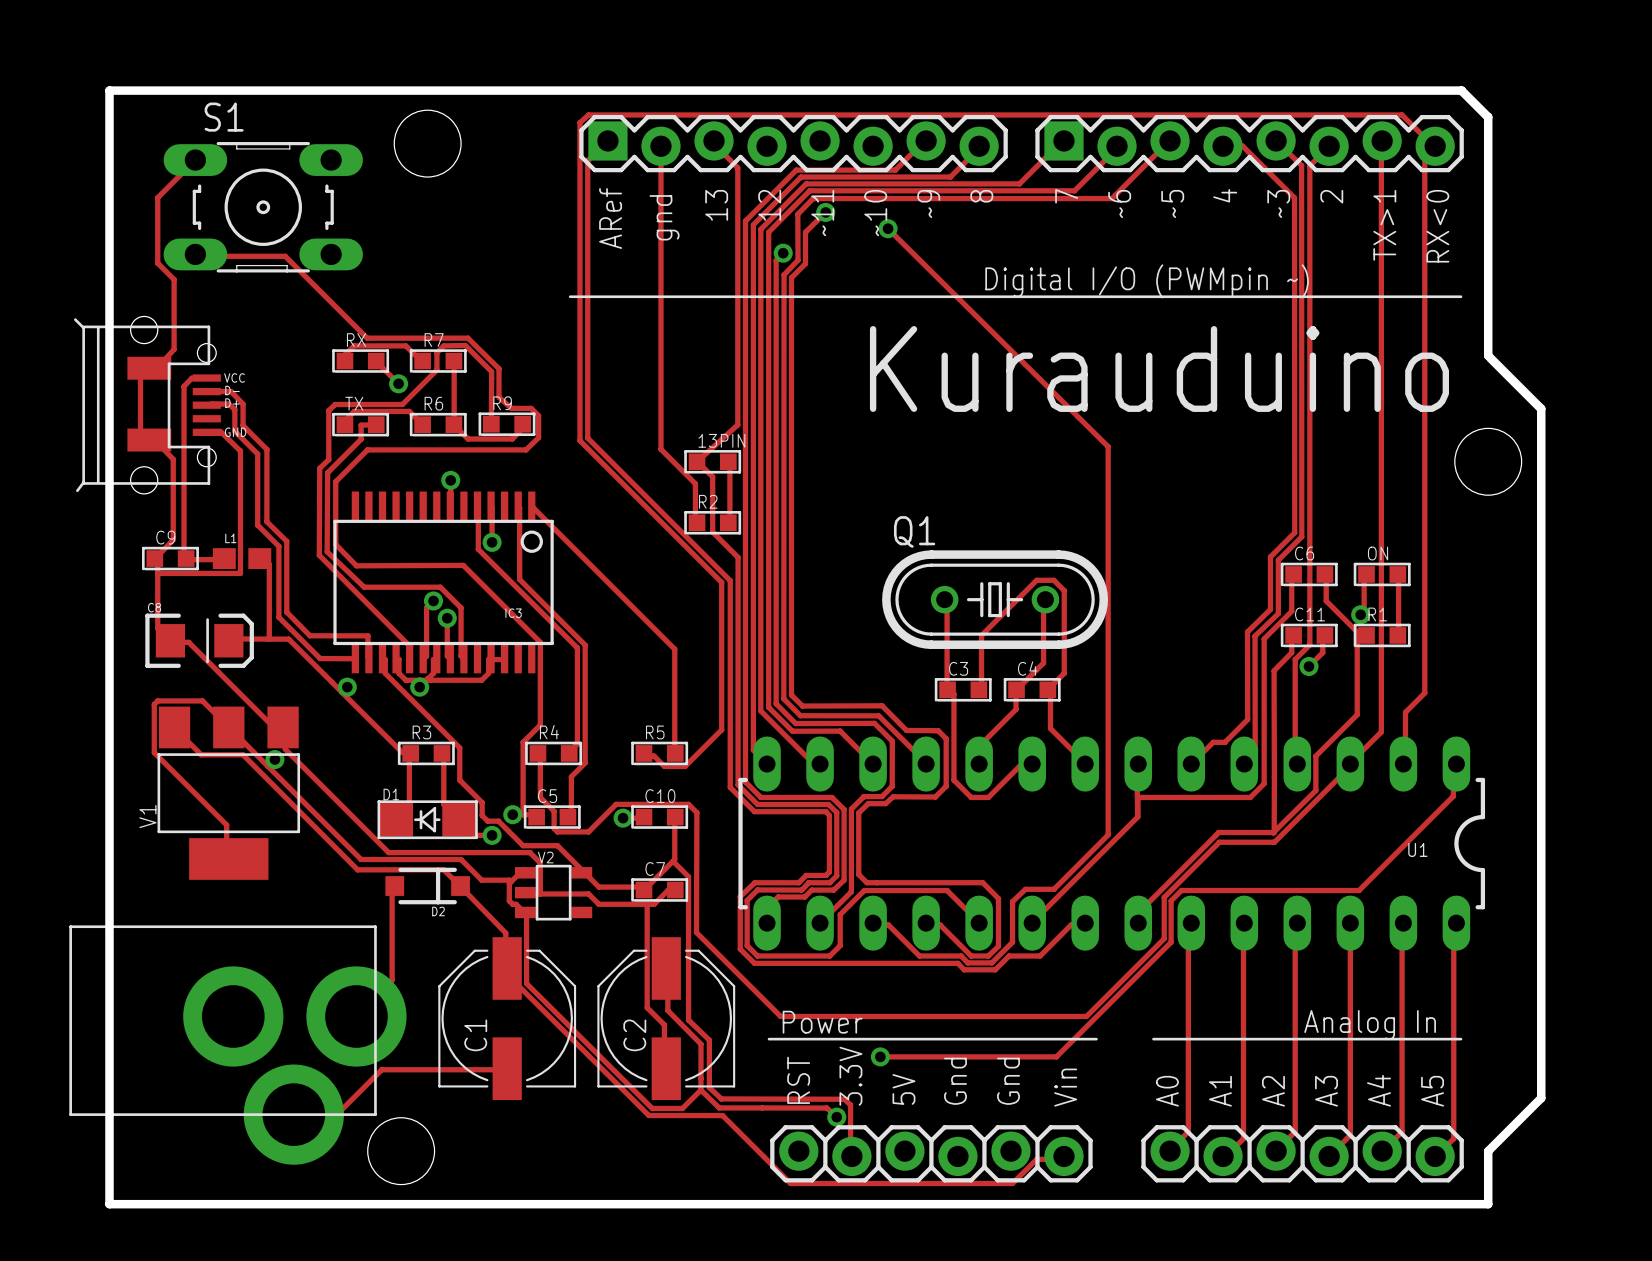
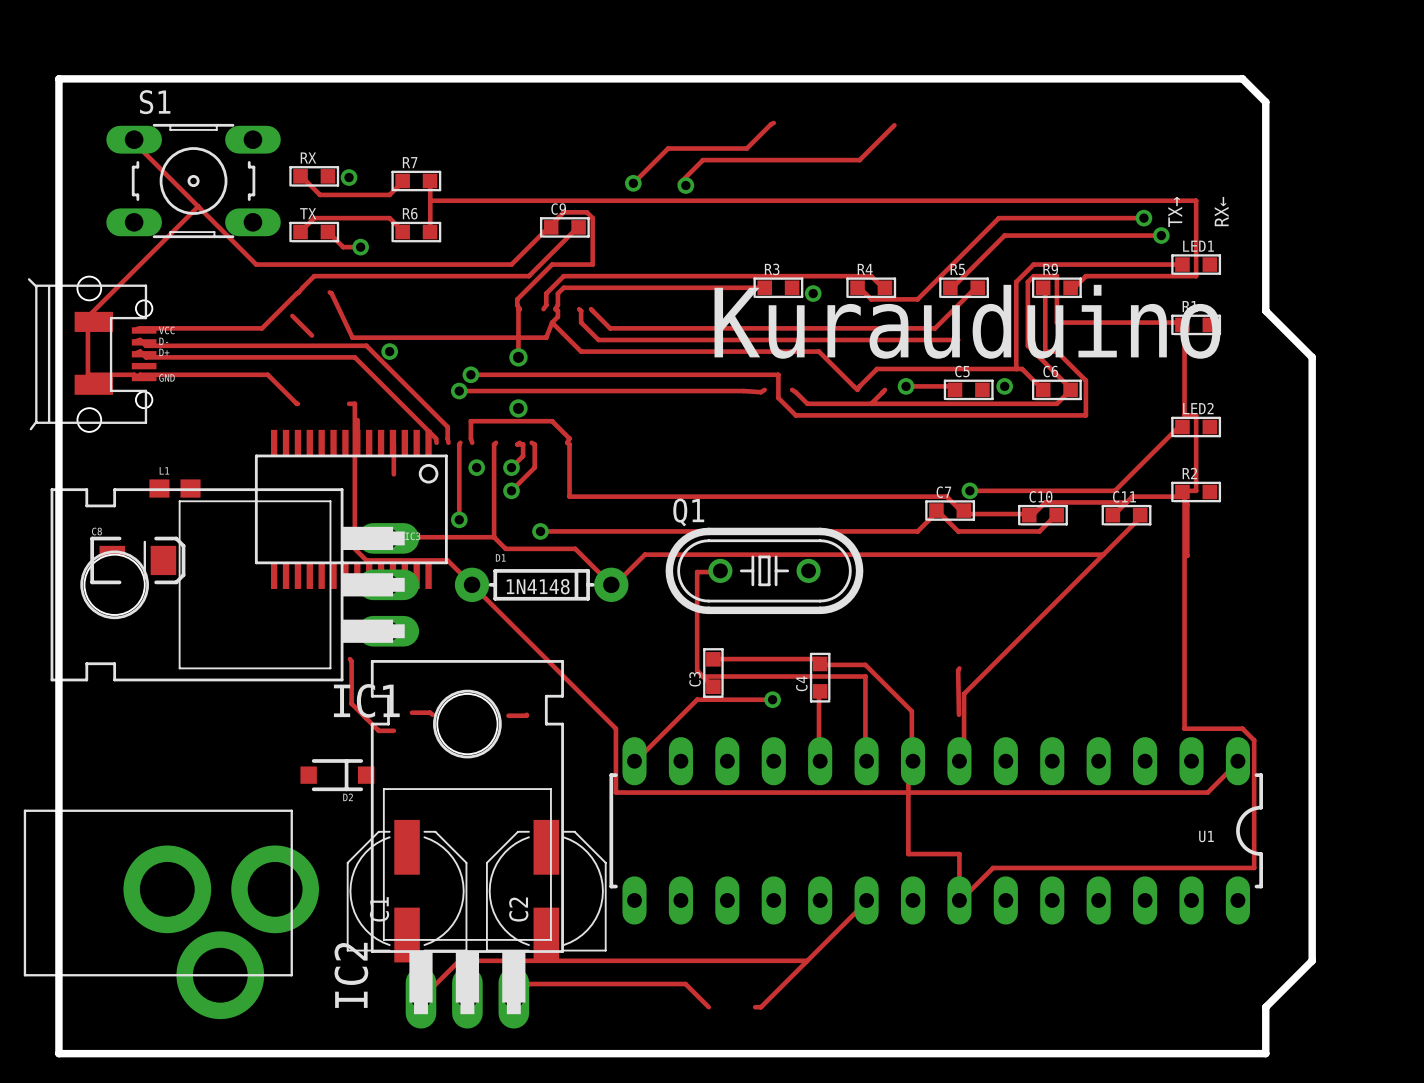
track: (607, 140) (587, 160) (587, 438) (730, 580) (730, 787) (754, 811) (826, 811) (829, 815) (829, 871) (826, 875) (806, 875) (798, 882) (754, 882) (740, 896) (740, 949) (754, 963) (957, 963) (964, 969) (995, 969) (1009, 956) (1040, 956) (1071, 924) (1084, 924) (1085, 923) -> none
track: (714, 140) (712, 142) (737, 167) (737, 424) (697, 461) (712, 476) (712, 532) (738, 557) (738, 784) (757, 804) (828, 804) (836, 812) (836, 875) (829, 882) (808, 882) (801, 890) (757, 889) (747, 900) (747, 945) (757, 956) (829, 956) (840, 945) (840, 914) (864, 890) (947, 890) (979, 923) -> none
track: (1063, 140) (1019, 183) (806, 183) (760, 229) (760, 710) (812, 763) (820, 764) -> none
track: (1170, 140) (1112, 198) (813, 198) (797, 214) (798, 260) (784, 274) (783, 698) (800, 715) (878, 715) (920, 757) (922, 763) (926, 764) -> none
track: (1276, 140) (1301, 165) (1301, 536) (1278, 560) (1278, 613) (1255, 636) (1255, 749) (1244, 764) -> none
track: (1382, 140) (1381, 731) (1350, 762) (1350, 766) (1274, 842) (1219, 842) (1164, 897) (1164, 938) (1086, 1016) (780, 1016) (696, 932) (696, 812) (688, 804) (616, 804) (588, 831) (557, 831) (554, 828) (554, 811) (540, 797) (540, 756) (537, 753) -> none
track: none -> (894, 125) (859, 160) (702, 160) (679, 183)
track: (660, 146) (660, 449) (695, 483) (695, 521) (697, 522) -> none
track: (979, 146) (950, 177) (801, 177) (753, 224) (753, 750) (767, 764) -> none
track: (1117, 146) (1074, 190) (809, 190) (768, 232) (768, 707) (792, 731) (840, 731) (873, 764) -> none
track: (1223, 146) (1242, 146) (1294, 197) (1294, 532) (1270, 556) (1270, 609) (1247, 632) (1247, 719) (1224, 742) (1213, 742) (1191, 764) -> none
track: (1329, 146) (1309, 165) (1309, 644) (1295, 659) (1295, 762) (1297, 764) -> none
track: (195, 160) (157, 197) (157, 263) (174, 279) (174, 349) (157, 367) (140, 366) (140, 435) (149, 440) (161, 439) (161, 446) (173, 459) (173, 539) (154, 558) (157, 559) (157, 628) (171, 642) (188, 642) (271, 725) (281, 725) (285, 728) (285, 749) (388, 852) (530, 852) (540, 862) (540, 893) -> (134, 139) (134, 142) (256, 264) (511, 264) (546, 229) (551, 227) (552, 223) (563, 212) (586, 212) (592, 218) (592, 264) (552, 264) (517, 299) (519, 309) (518, 357)
track: (805, 170) (796, 170) (745, 221) (745, 782) (760, 797) (832, 797) (844, 809) (844, 880) (833, 890) (811, 890) (804, 896) (778, 896) (766, 909) (767, 923) -> (668, 148) (633, 183)
track: none -> (300, 176) (320, 194) (389, 194) (402, 181)
via: none -> (349, 177)
track: none -> (430, 181) (430, 232)
track: (825, 212) (805, 232) (805, 263) (791, 277) (791, 695) (802, 706) (882, 705) (906, 730) (938, 730) (946, 738) (946, 786) (935, 797) (893, 796) (885, 803) (868, 803) (858, 812) (858, 874) (866, 882) (982, 882) (998, 898) (998, 946) (988, 956) (971, 956) (940, 924) (926, 924) (926, 923) -> none
track: (888, 228) (1108, 446) (1108, 834) (1054, 889) (1025, 889) (1012, 901) (1012, 942) (991, 962) (967, 962) (961, 956) (919, 956) (888, 924) (874, 924) (873, 923) -> none
via: (888, 228) -> none
track: none -> (430, 200) (1196, 200) (1196, 276) (1085, 276) (1074, 287) (1070, 287)
track: none -> (198, 206) (87, 316) (87, 374) (134, 374) (136, 376) (140, 374) (267, 374) (297, 403)
text: none -> RX← (1221, 211)
text: none -> TX→ (1175, 211)
track: none -> (1143, 218) (998, 218) (917, 299) (871, 299) (857, 287)
via: none -> (1143, 218)
track: (783, 253) (776, 260) (776, 703) (795, 723) (874, 723) (892, 741) (892, 786) (882, 796) (863, 796) (851, 809) (851, 891) (820, 923) -> none
via position: (783, 253) -> (633, 183)
track: (195, 254) (195, 256) (285, 256) (367, 338) (467, 338) (498, 368) (498, 397) (511, 408) (531, 408) (538, 415) (538, 437) (526, 449) (367, 449) (335, 481) (335, 544) (356, 565) (463, 565) (540, 642) (540, 725) (523, 742) (523, 814) -> none
track: none -> (578, 227) (528, 276) (314, 276) (262, 328) (136, 328)
track: none -> (300, 232) (314, 218) (389, 218) (402, 232)
track: none -> (327, 232) (343, 247) (360, 247)
track: none -> (1161, 235) (1004, 235) (950, 287)
via: none -> (1161, 235)
via: none -> (360, 247)
track: none -> (1182, 264) (1033, 264) (1016, 281) (1016, 368)
LED1: none -> (1196, 264)
track: none -> (764, 287) (563, 287) (557, 293) (557, 305) (555, 309) (557, 310) (557, 316) (552, 322)
track: none -> (884, 287) (871, 276) (563, 276) (546, 293) (546, 305) (543, 309)
track: none -> (977, 287) (935, 328) (610, 328) (591, 309)
track: none -> (1043, 287) (1045, 287) (1045, 351) (1056, 351) (1085, 380) (1085, 415) (795, 415) (778, 398) (778, 374) (470, 374)
track: none -> (329, 292) (352, 337) (546, 337) (552, 322)
via: none -> (813, 293)
track: none -> (579, 309) (581, 310) (581, 322) (598, 339) (958, 339)
track: (344, 361) (345, 354) (354, 345) (405, 345) (422, 361) -> none
RX position: (360, 361) -> (314, 176)
R7 position: (438, 361) -> (416, 181)
track: (453, 361) (453, 424) (467, 438) (512, 438) (525, 425) (522, 424) -> none
track: none -> (552, 322) (581, 351) (819, 351) (857, 389) (877, 368) (1022, 368) (1043, 389)
track: (206, 378) (191, 378) (184, 386) (184, 554) (188, 559) (224, 558) -> none
via: (398, 383) -> none
track: none -> (136, 340) (140, 339) (145, 345) (366, 345) (447, 427) (448, 442)
track: (206, 391) (231, 391) (243, 404) (243, 425) (266, 449) (266, 521) (286, 541) (286, 612) (310, 635) (368, 635) (368, 658) -> none
via: none -> (389, 351)
track: none -> (136, 352) (140, 351) (145, 357) (354, 357) (436, 438) (436, 442)
track: (206, 405) (228, 404) (234, 409) (234, 431) (257, 454) (257, 525) (278, 546) (278, 617) (320, 658) (355, 658) -> none
via: none -> (518, 357)
track: (344, 424) (345, 421) (343, 421) (354, 411) (409, 411) (422, 424) -> none
TX position: (360, 424) -> (314, 232)
track: (376, 424) (361, 425) (361, 439) (327, 472) (327, 551) (364, 587) (440, 587) (461, 607) (461, 656) (463, 658) -> none
R6 position: (438, 424) -> (416, 232)
track: (491, 424) (491, 371) (465, 345) (443, 345) (436, 352) (436, 370) (402, 404) (335, 404) (328, 410) (328, 459) (319, 468) (319, 555) (409, 645) (409, 658) -> none
R9 position: (507, 424) -> (1056, 287)
via: none -> (470, 374)
track: (206, 432) (199, 432) (221, 432) (240, 451) (240, 573) (157, 573) -> none
track: none -> (906, 386) (952, 386) (955, 389)
via: none -> (906, 386)
via: none -> (1004, 386)
track: none -> (764, 389) (760, 392) (459, 391)
track: none -> (792, 389) (807, 403) (1056, 403) (1070, 389) (1027, 345) (1027, 281) (1033, 276) (1056, 276) (1056, 322) (1178, 322) (1184, 328) (1184, 415) (1196, 415) (1196, 490) (1182, 491)
track: none -> (884, 389) (871, 403)
via: none -> (459, 391)
track: none -> (349, 403) (354, 403) (354, 531) (378, 531) (383, 537) (388, 538) (494, 537)
13PIN: (712, 461) -> none
track: (728, 461) (729, 463) (729, 521) (728, 522) -> none
via: none -> (518, 408)
via: (450, 480) -> none
track: none -> (1182, 427) (1178, 427) (1114, 490) (969, 490)
LED2: none -> (1196, 427)
track: (477, 506) (478, 549) (577, 647) (577, 744) (567, 752) (569, 753) -> none
track: (518, 506) (519, 579) (585, 645) (585, 762) (571, 776) (571, 814) (567, 817) -> none
track: (531, 506) (674, 649) (675, 753) -> none
track: none -> (460, 442) (459, 519)
track: none -> (472, 442) (470, 421) (552, 421) (569, 438) (567, 442) (569, 444) (569, 496) (946, 496) (958, 508) (963, 510) (964, 514) (1029, 515) (1033, 514) (1045, 502) (1126, 502)
track: none -> (496, 442) (494, 444) (494, 537)
track: none -> (519, 442) (517, 444) (523, 444) (523, 456) (511, 467)
track: none -> (531, 442) (534, 444) (534, 467) (511, 490)
R2 position: (712, 522) -> (1196, 491)
via: none -> (476, 467)
via: none -> (511, 467)
via: (492, 542) -> none
C9 position: (170, 558) -> (564, 227)
track: (259, 558) (269, 564) (269, 639) -> none
via: none -> (511, 490)
via: none -> (969, 490)
track: none -> (1182, 491) (1178, 496) (1132, 496) (1112, 515)
track: none -> (1182, 491) (1184, 496) (1184, 728) (1242, 728) (1254, 740) (1254, 867) (993, 867) (959, 900) (959, 854) (908, 854) (908, 761) (913, 761) (911, 711) (865, 664) (824, 664) (820, 663) (819, 659) (713, 659)
track: (1293, 574) (1291, 576) (1291, 611) (1264, 638) (1264, 783) (1250, 797) (1137, 797) (1137, 817) (1032, 923) -> none
C6 position: (1309, 574) -> (1056, 389)
track: (1324, 574) (1326, 600) (1360, 635) (1366, 635) -> none
track: (1366, 574) (1364, 576) (1364, 611) (1360, 614) -> none
ON: (1382, 574) -> none
track: none -> (1056, 515) (1039, 531) (958, 531) (936, 510) (917, 531) (540, 531)
track: none -> (1140, 515) (1138, 519) (964, 693) (964, 757) (959, 761)
via: none -> (459, 519)
track: (944, 599) (947, 600) (947, 687) (947, 689) (953, 694) (953, 780) (971, 797) (988, 797) (1019, 766) (1029, 766) (1032, 764) -> none
Q1 position: (995, 599) -> (764, 570)
track: (1045, 599) (1043, 600) (1043, 663) (1016, 690) (1016, 709) (979, 746) (979, 764) -> none
track: (433, 600) (426, 607) (426, 656) (423, 658) -> none
via: (433, 600) -> none
via: none -> (540, 531)
track: none -> (343, 537) (366, 560) (447, 560) (615, 728) (615, 792) (1207, 792) (1237, 761)
track: none -> (494, 537) (505, 548) (575, 548) (611, 584) (615, 583) (644, 554) (1103, 554)
via: (1360, 614) -> none
track: (447, 618) (447, 656) (450, 658) -> none
via: (447, 618) -> none
track: (1358, 633) (1357, 635) (1357, 714) (1315, 756) (1315, 790) (1274, 832) -> none
track: (1293, 635) (1291, 635) (1291, 652) (1274, 670) (1274, 832) -> none
C11 position: (1309, 635) -> (1126, 515)
track: (1324, 635) (1322, 635) (1322, 652) (1308, 666) -> none
R1 position: (1382, 635) -> (1196, 324)
track: (269, 639) (230, 638) (228, 640) -> none
track: (269, 639) (288, 639) (342, 692) -> none
part: (825, 647) -> none
track: none -> (720, 570) (697, 572) (697, 670) (713, 686)
track: (382, 658) (385, 659) (385, 673) (459, 747) (459, 780) (482, 802) (482, 815) (487, 821) (498, 821) (523, 845) (557, 845) (581, 869) (581, 872) (585, 873) (598, 887) (643, 887) (644, 889) (647, 887) (674, 859) (675, 817) -> none
track: (396, 658) (399, 659) (399, 673) (405, 680) (426, 680) (433, 673) (433, 659) (436, 658) -> none
track: (504, 658) (488, 659) (488, 673) (481, 680) (430, 680) (428, 678) -> none
via: (1308, 666) -> none
IC1: none -> (234, 584)
D1 value: none -> 1N4148 (538, 586)
via: (347, 687) -> none
via: (419, 687) -> none
C3 rotation: 0° (963, 689) -> 90° counterclockwise (713, 673)
C3 position: (963, 689) -> (713, 673)
track: (978, 689) (981, 687) (981, 635) (1036, 580) (1053, 580) (1064, 590) (1064, 673) (1047, 689) (1050, 690) (1050, 728) (1085, 764) -> none
C4 rotation: 0° (1032, 689) -> 90° counterclockwise (820, 677)
C4 position: (1032, 689) -> (820, 677)
track: (342, 692) (402, 752) (410, 753) (409, 807) (396, 819) -> none
track: (174, 727) (201, 754) (243, 754) (357, 869) (443, 869) (505, 933) (505, 966) (509, 969) (509, 976) (648, 1115) (722, 1115) (790, 1183) (1012, 1183) (1036, 1159) (1060, 1159) (1063, 1156) -> none
R3 position: (426, 753) -> (778, 287)
R4 position: (553, 753) -> (871, 287)
track: (644, 753) (647, 756) (654, 756) (664, 766) (685, 766) (721, 729) (721, 582) (579, 440) (579, 122) (588, 114) (1402, 114) (1435, 146) (1424, 157) (1424, 693) (1405, 712) (1405, 762) (1403, 764) -> none
R5 position: (659, 753) -> (964, 287)
via: (274, 759) -> none
track: (1456, 764) (1453, 766) (1453, 796) (1359, 890) (1181, 890) (1171, 900) (1171, 942) (1056, 1056) (880, 1056) -> none
track: none -> (702, 676) (865, 676) (866, 761)
track: none -> (820, 691) (820, 761)
V1: (228, 793) -> none
track: none -> (772, 699) (697, 699) (634, 761)
via: none -> (772, 699)
D1 footprint: [377, 800, 478, 840] -> [454, 567, 629, 603]
via: (512, 814) -> none
C5 position: (552, 817) -> (968, 389)
C10 position: (659, 817) -> (1042, 515)
via: (623, 818) -> none
track: (1274, 832) (1218, 832) (1140, 911) (1140, 921) (1138, 923) -> none
via: (492, 835) -> none
U1 position: (1111, 843) -> (936, 830)
track: (228, 858) (226, 856) (226, 825) (154, 752) (154, 704) (157, 700) (202, 700) (361, 859) (461, 859) (481, 880) (509, 880) (511, 881) -> none
track: (673, 861) (688, 876) (688, 1020) (709, 1040) (709, 1087) (721, 1098) (844, 1099) (850, 1105) (851, 1156) -> none
track: (525, 872) (523, 869) (509, 883) (509, 900) (512, 904) (516, 904) (526, 914) (526, 983) (652, 1108) (682, 1108) (700, 1090) -> none
track: (394, 886) (392, 887) (392, 980) (356, 1016) -> none
C7 position: (659, 889) -> (950, 510)
track: (675, 889) (667, 890) (654, 904) (598, 904) (588, 893) (525, 892) -> none
V2: (553, 892) -> none
track: (647, 904) (647, 1007) (664, 1024) (664, 1066) (666, 1068) -> none
track: (1191, 923) (1188, 924) (1188, 1131) (1170, 1151) -> none
track: (1244, 923) (1243, 1138) (1226, 1155) (1223, 1156) -> none
track: (1297, 923) (1295, 924) (1295, 1131) (1276, 1151) -> none
track: (1350, 923) (1350, 1135) (1329, 1156) -> none
track: (1403, 923) (1402, 1131) (1382, 1151) -> none
track: (1456, 923) (1453, 924) (1453, 1138) (1435, 1156) -> none
IC2: none -> (467, 844)
track: (666, 968) (667, 969) (667, 1010) (700, 1044) (700, 1090) -> none
track: none -> (866, 900) (760, 1007) (755, 1007)
via: (880, 1056) -> none
track: (507, 1068) (381, 1069) (336, 1114) (293, 1114) -> none
track: (700, 1090) (719, 1107) (826, 1108) (836, 1117) -> none
track: none -> (807, 960) (459, 960) (420, 997)
via: (836, 1117) -> none
track: none -> (513, 997) (528, 984) (685, 984) (708, 1007)

